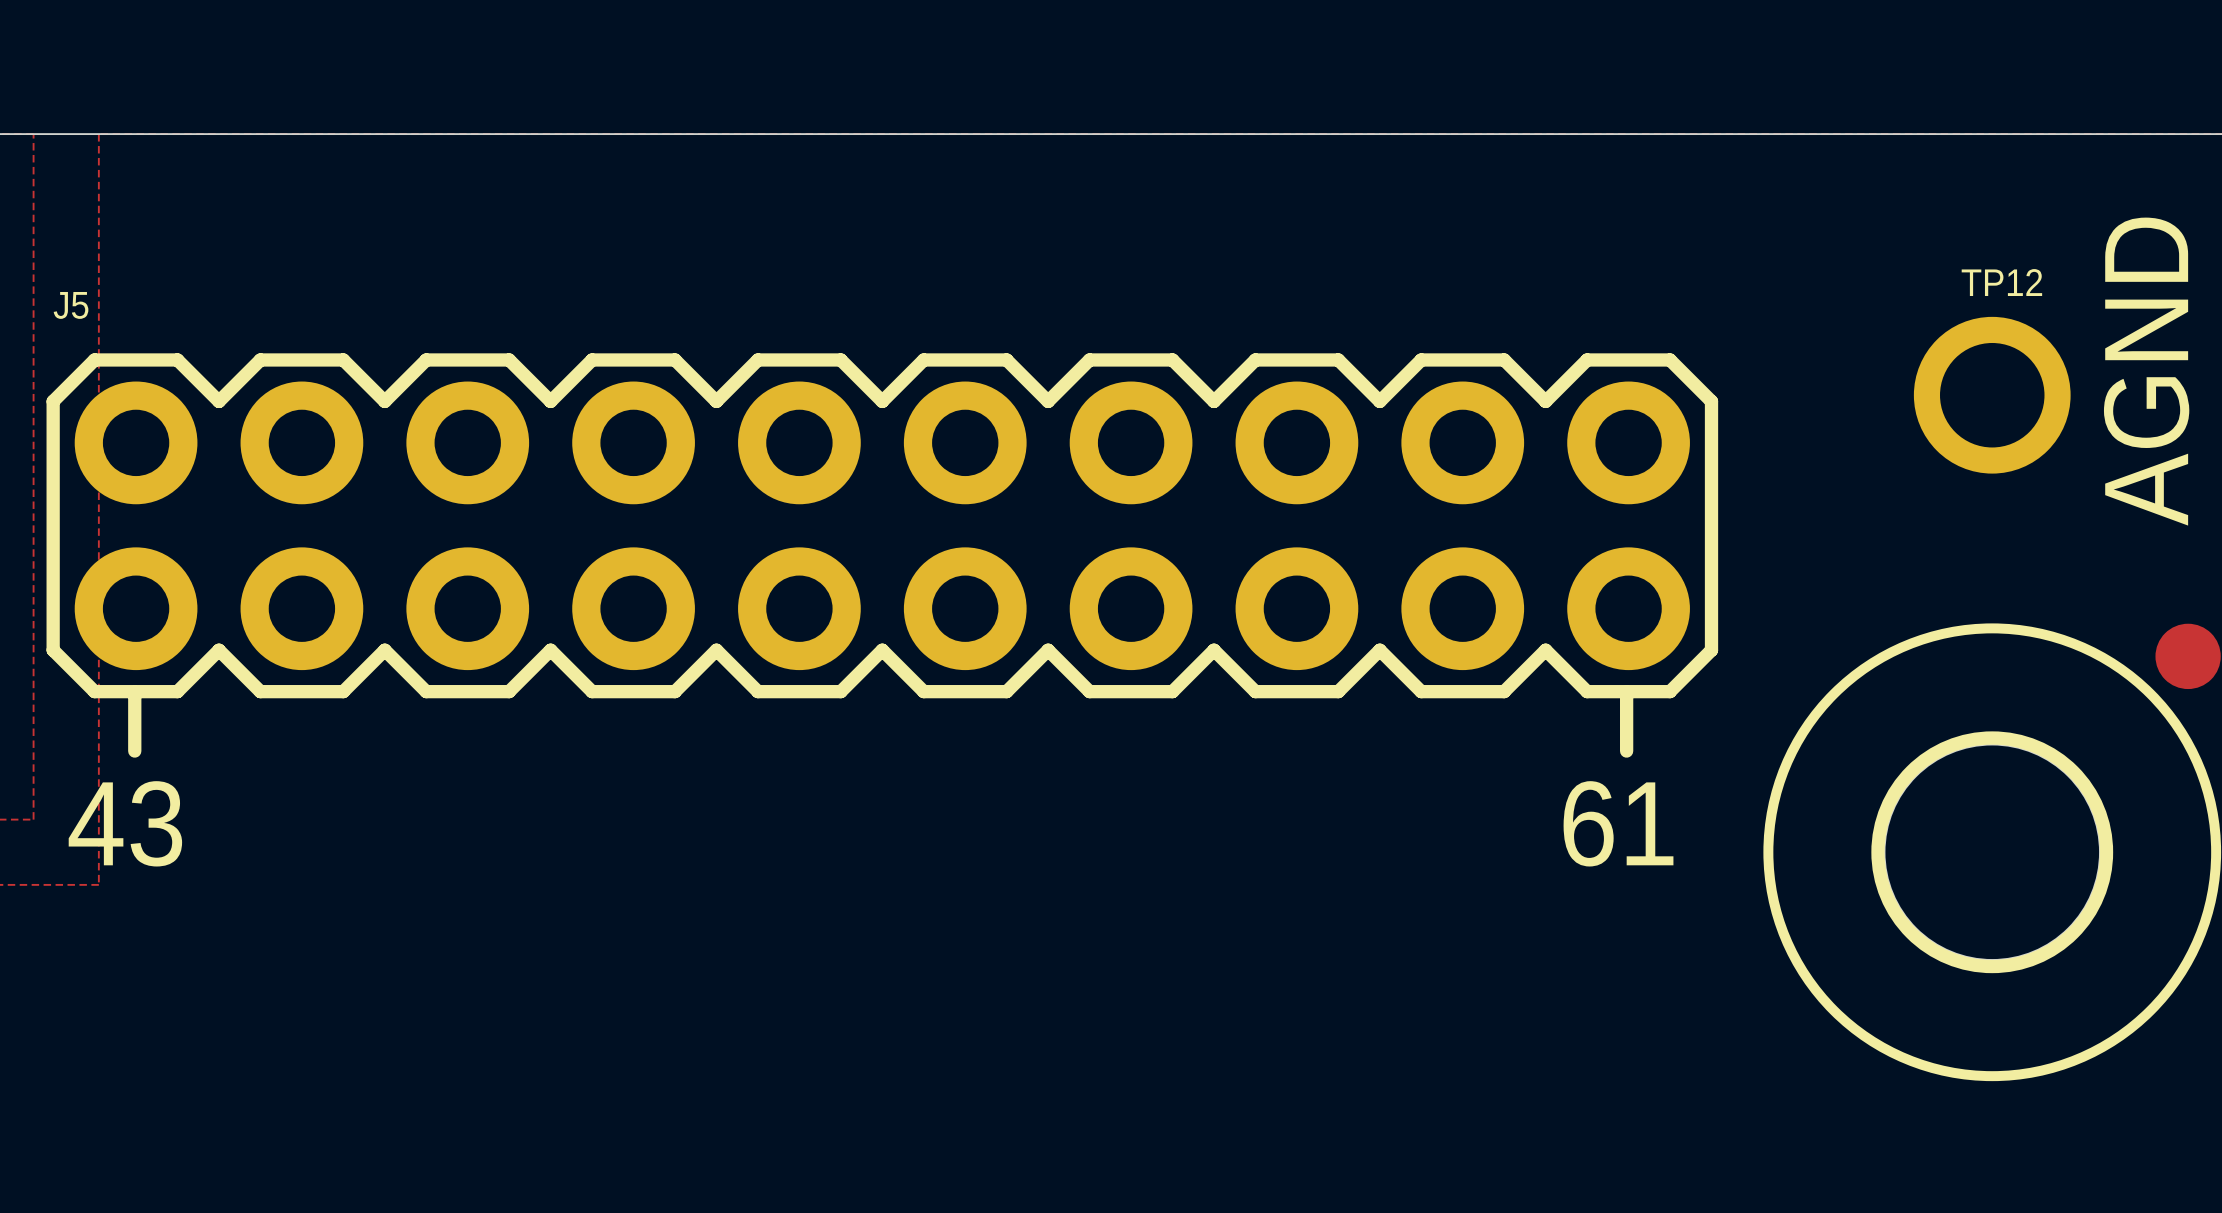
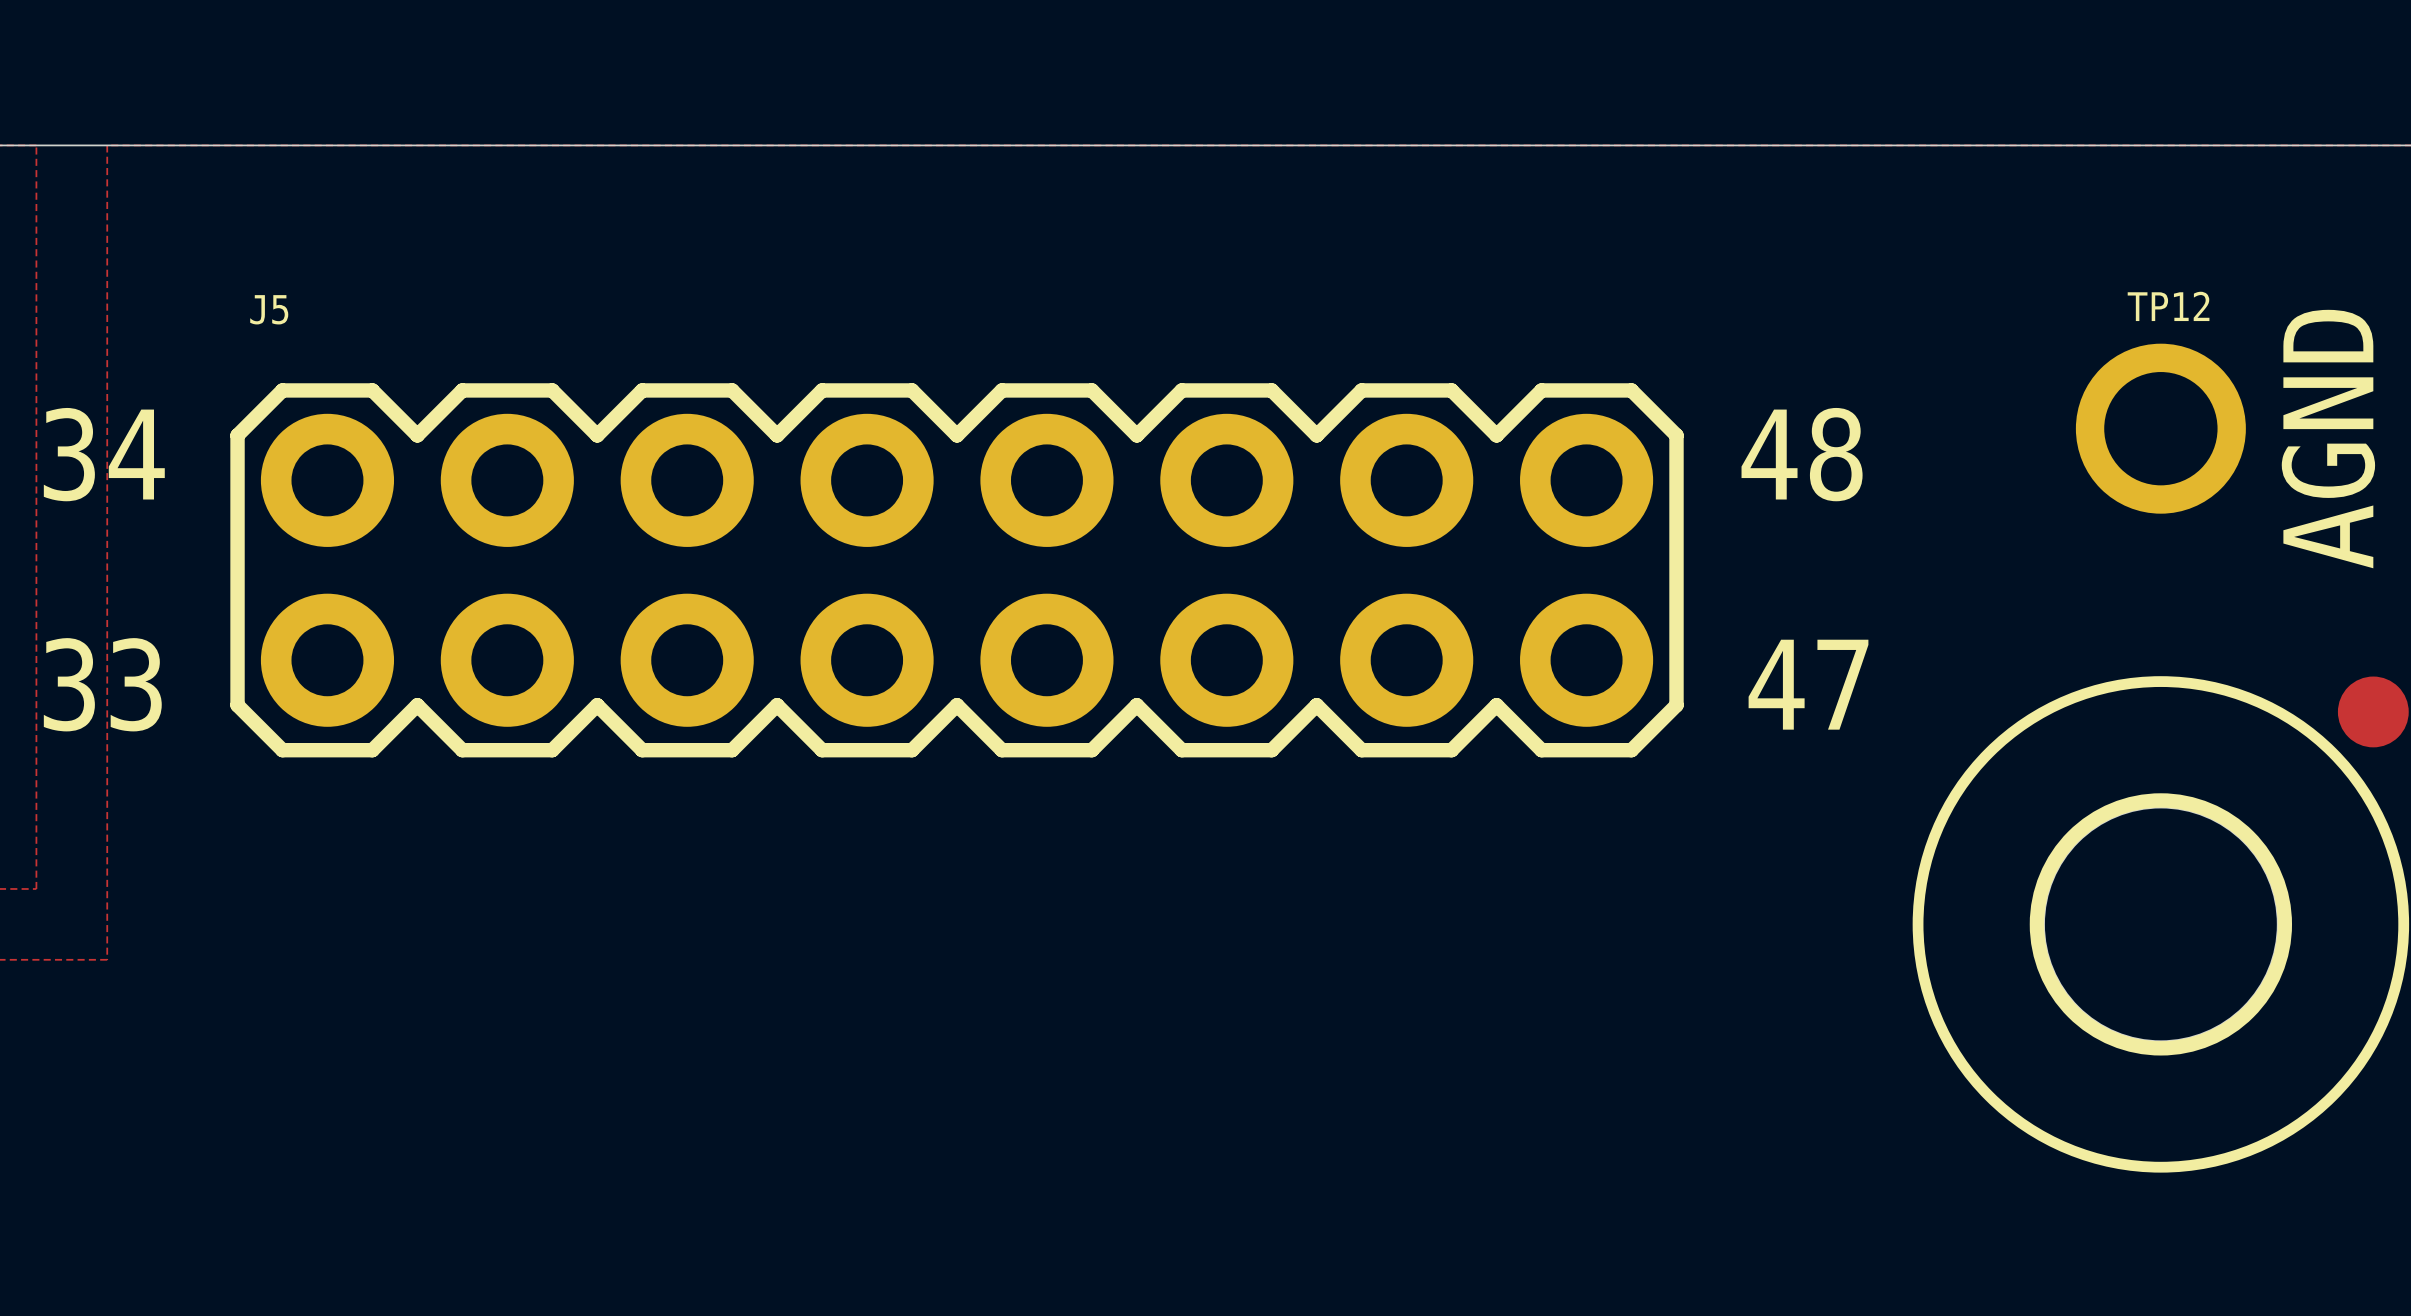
J5 name position: J5 (71, 305) -> J5 (269, 309)
J5 footprint: [46, 353, 1719, 699] -> [230, 383, 1684, 758]
text: none -> 34 (104, 454)
text: none -> 48 (1802, 454)
text: none -> 33 (102, 684)
text: none -> 47 (1808, 684)
line: (134, 692) (134, 751) -> none
line: (1626, 692) (1626, 751) -> none
text: 43 (125, 823) -> none
text: 61 (1618, 823) -> none

